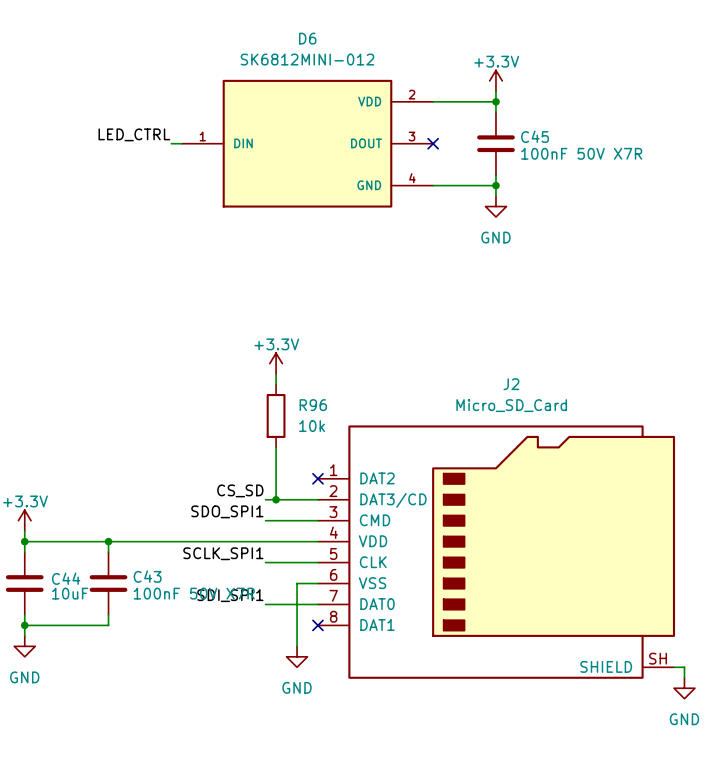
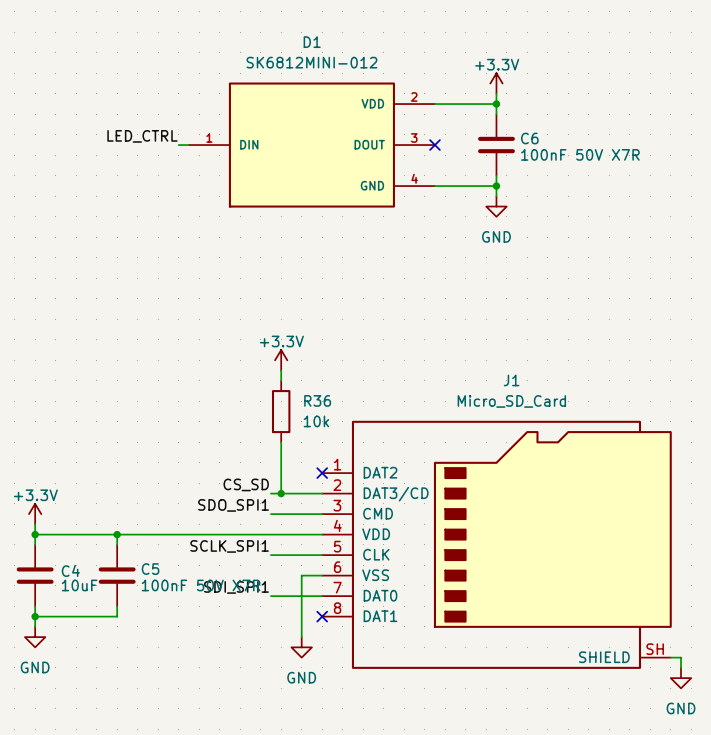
D6 name: D6 (307, 38) -> D1 (312, 42)
C45 name: C45 (535, 136) -> C6 (529, 138)
J2 name: J2 (511, 384) -> J1 (511, 380)
R96 name: R96 (313, 405) -> R36 (317, 400)
C43 name: C43 (147, 576) -> C5 (150, 569)
C44 name: C44 (66, 578) -> C4 (70, 570)

